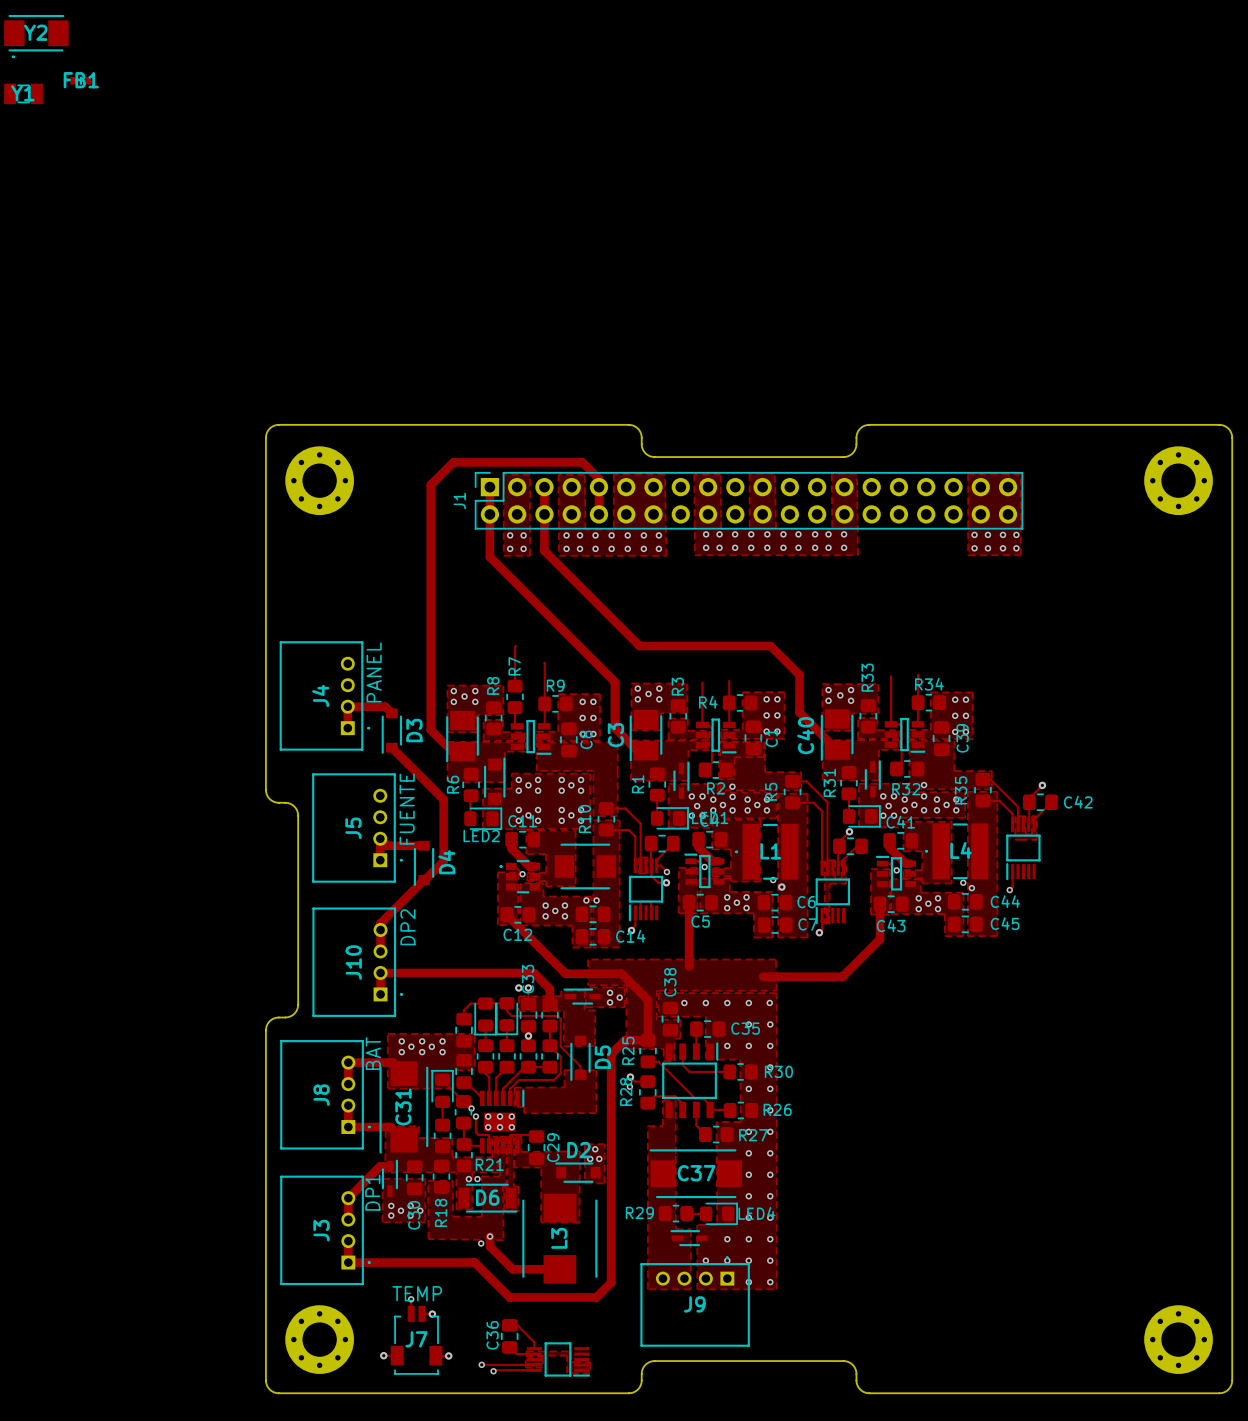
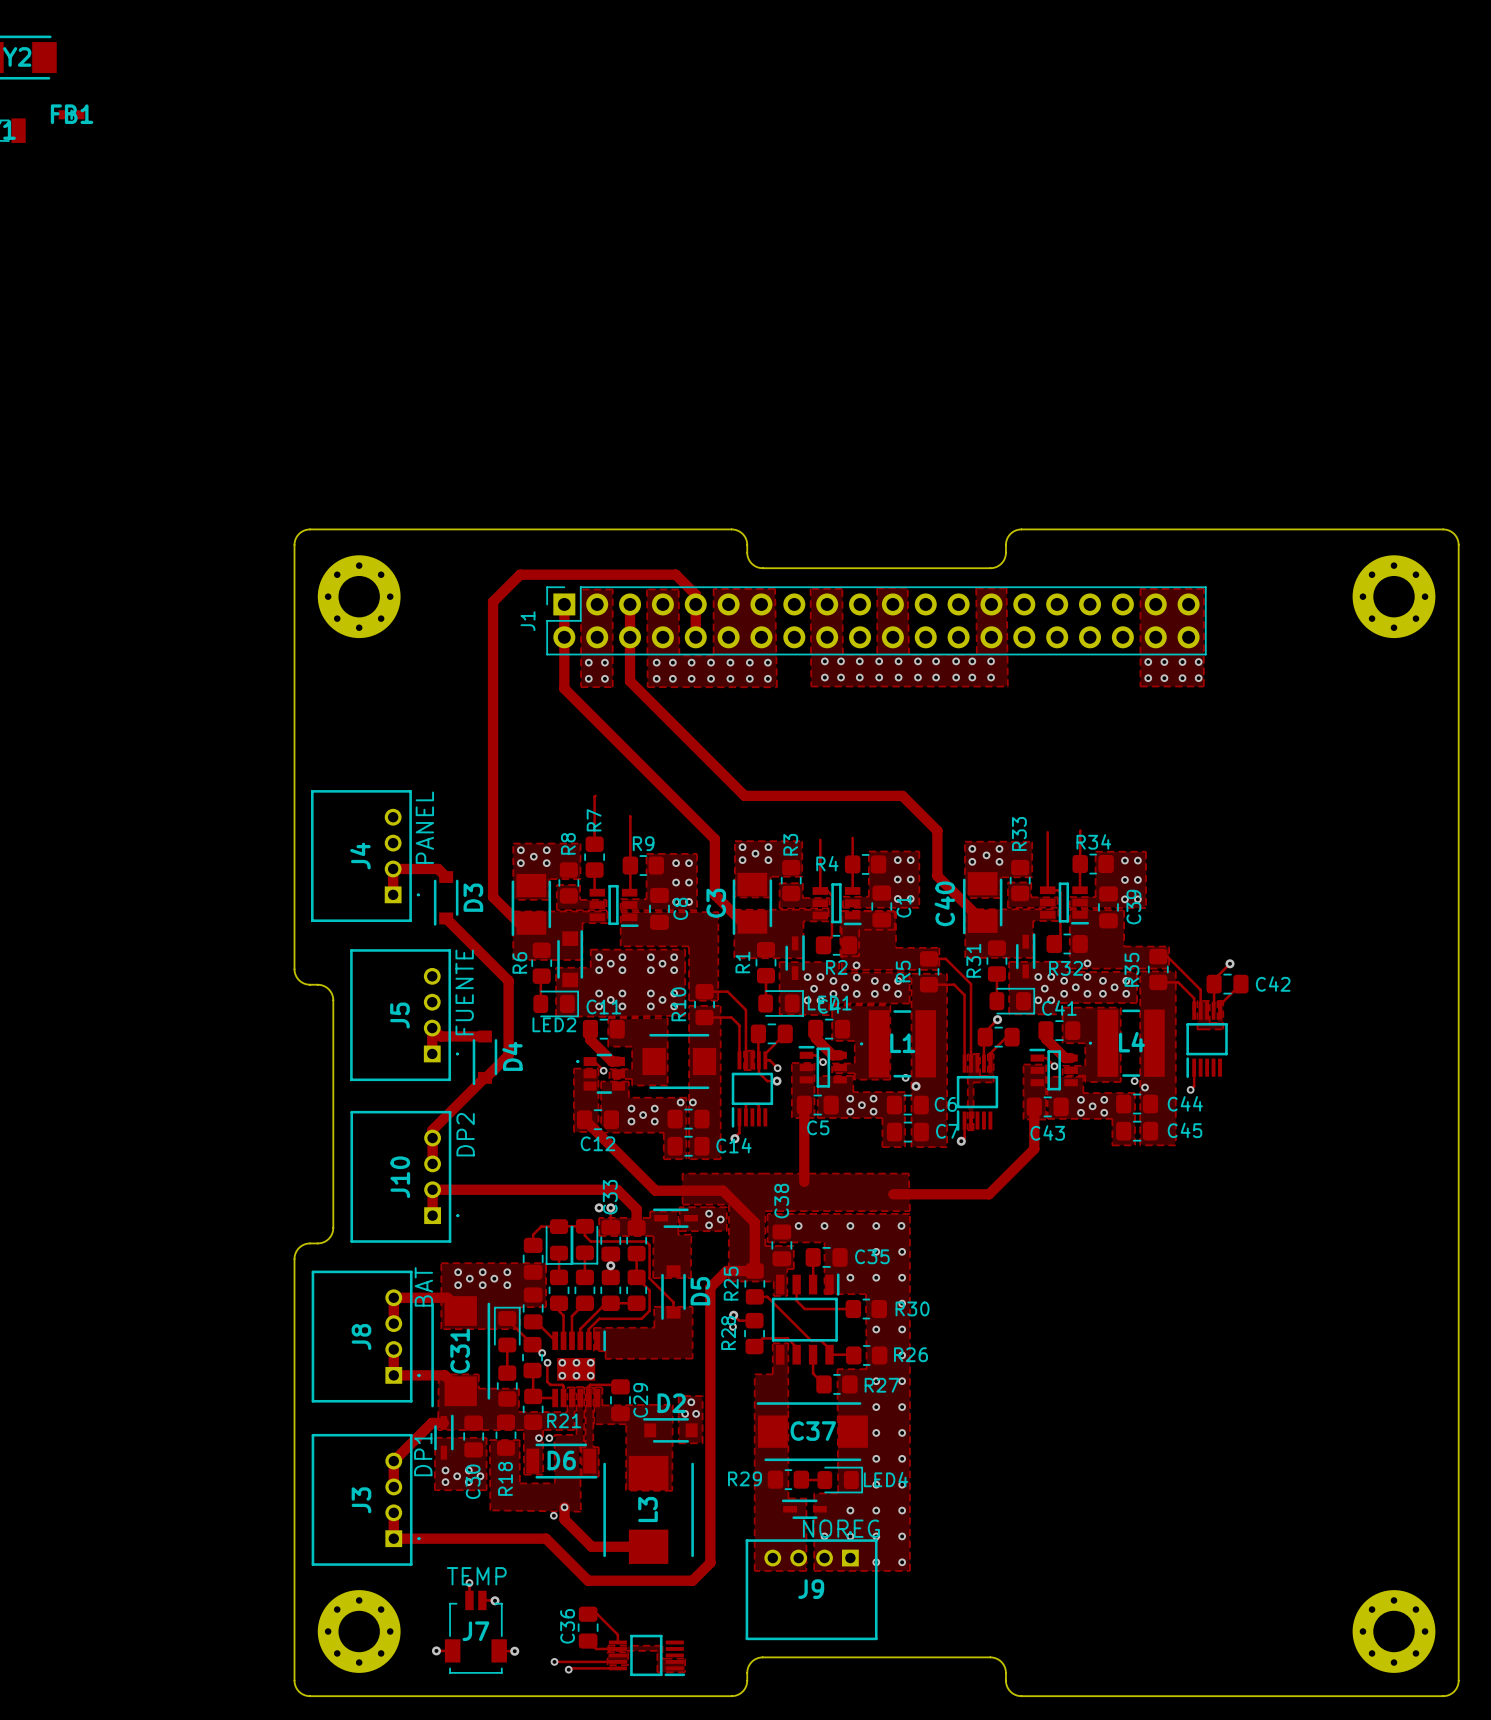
J9 text: none -> NOREG (841, 1528)

